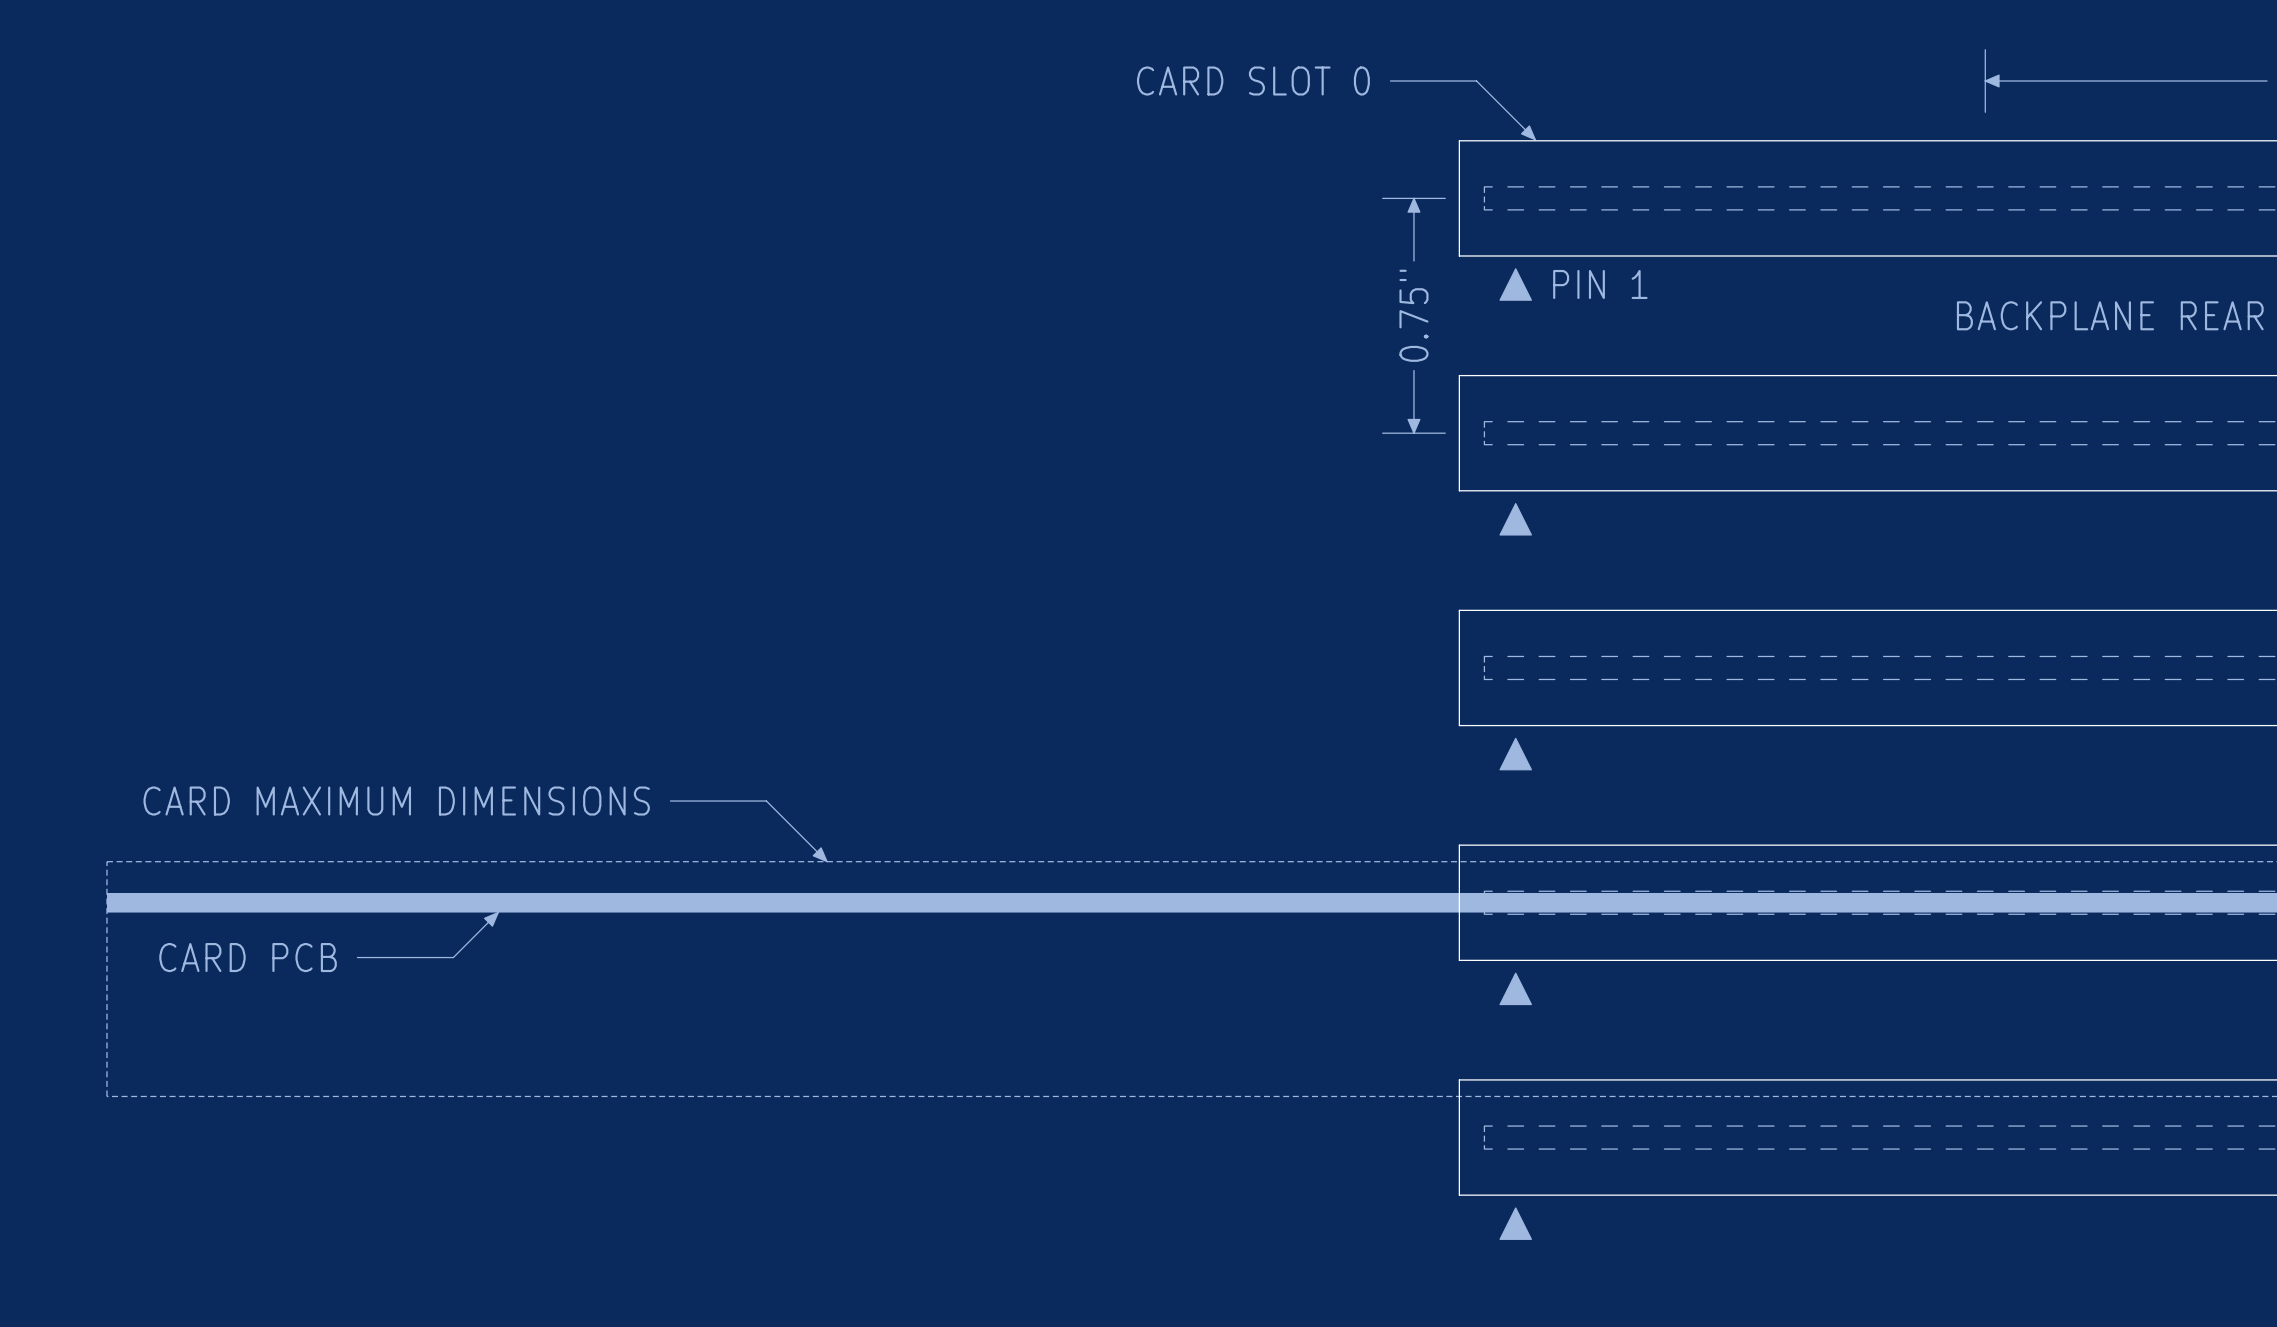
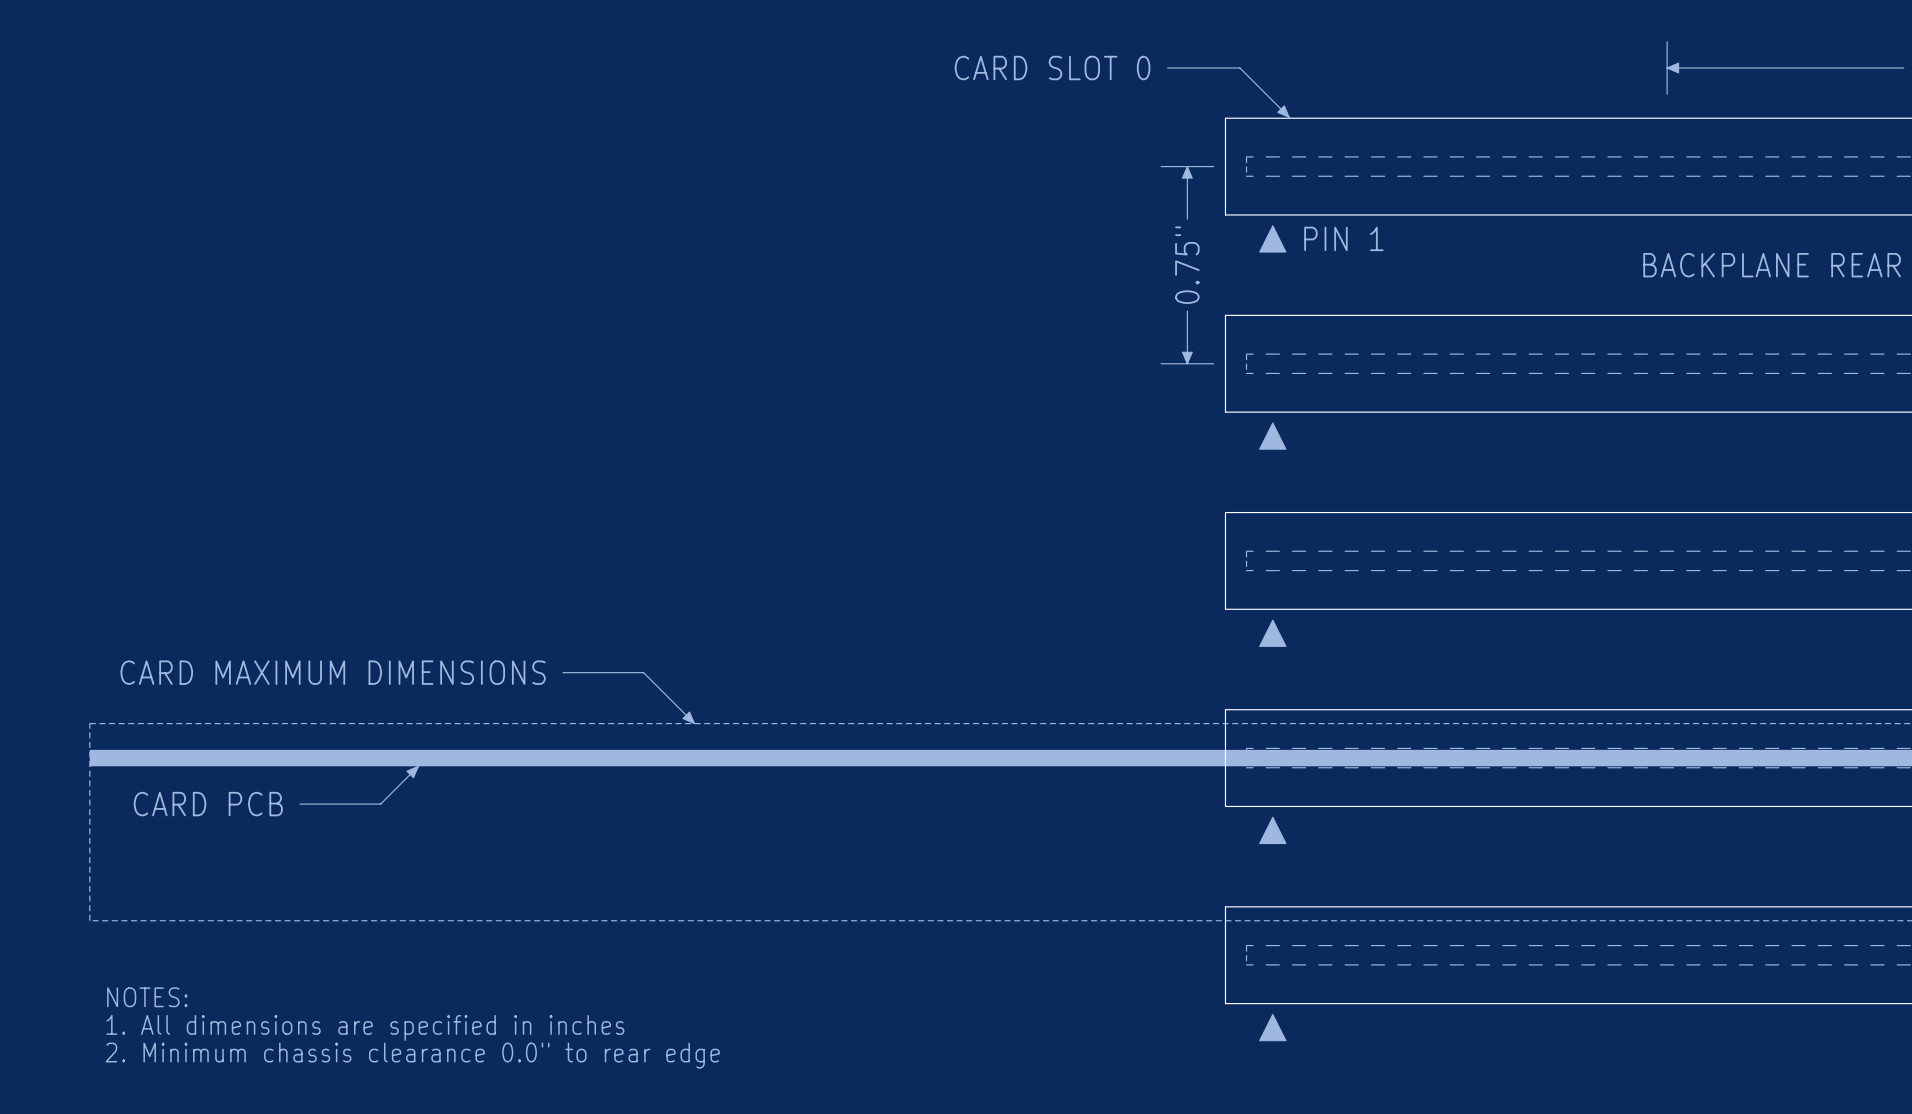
text: none -> NOTES: (147, 997)
text: none -> 1. All dimensions are specified in inches (365, 1027)
text: none -> 2. Minimum chassis clearance 0.0" to rear edge (412, 1055)

